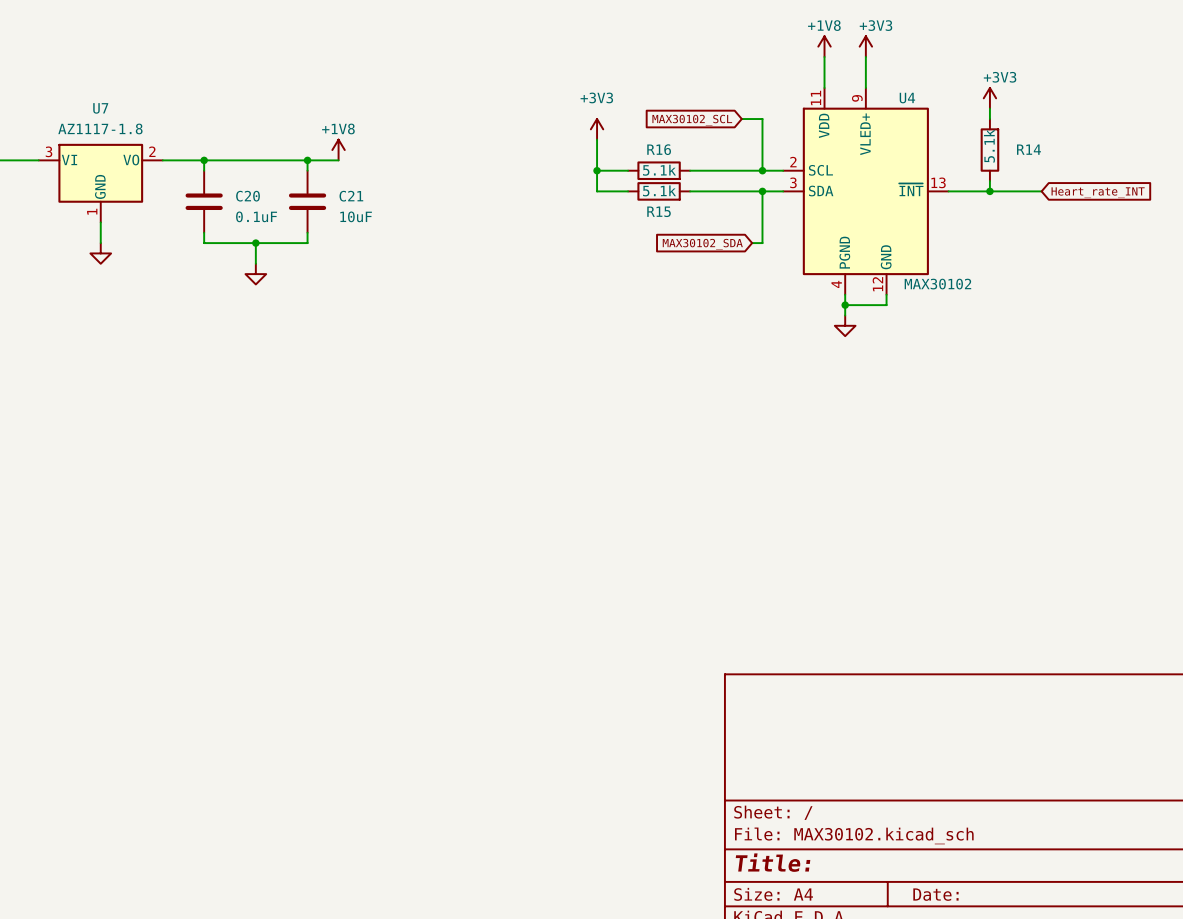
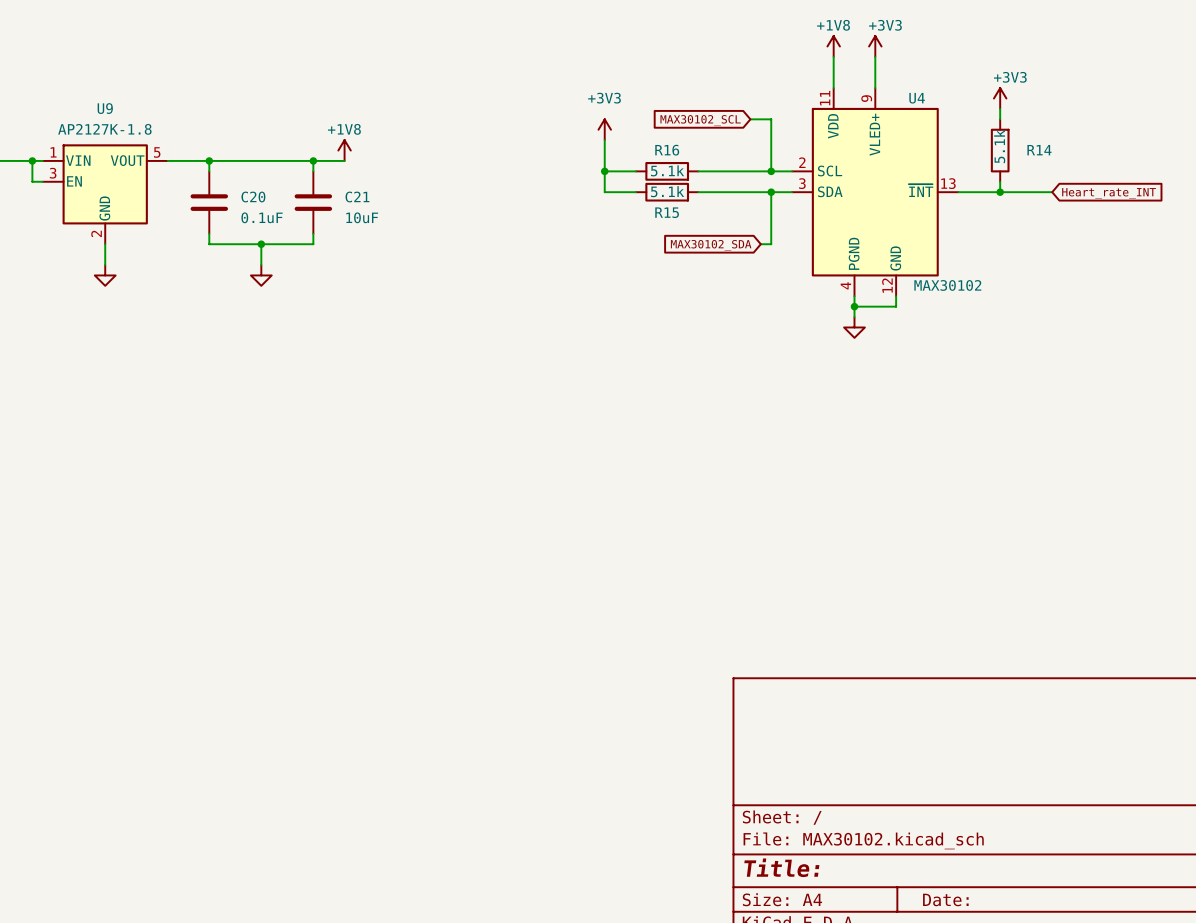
wire: none -> (32, 160) (32, 181) (42, 181)
junction: none -> (32, 160)
U7: AZ1117-1.8 (100, 183) -> none
U9: none -> AP2127K-1.8 (105, 194)
power symbol position: (100, 253) -> (105, 275)

